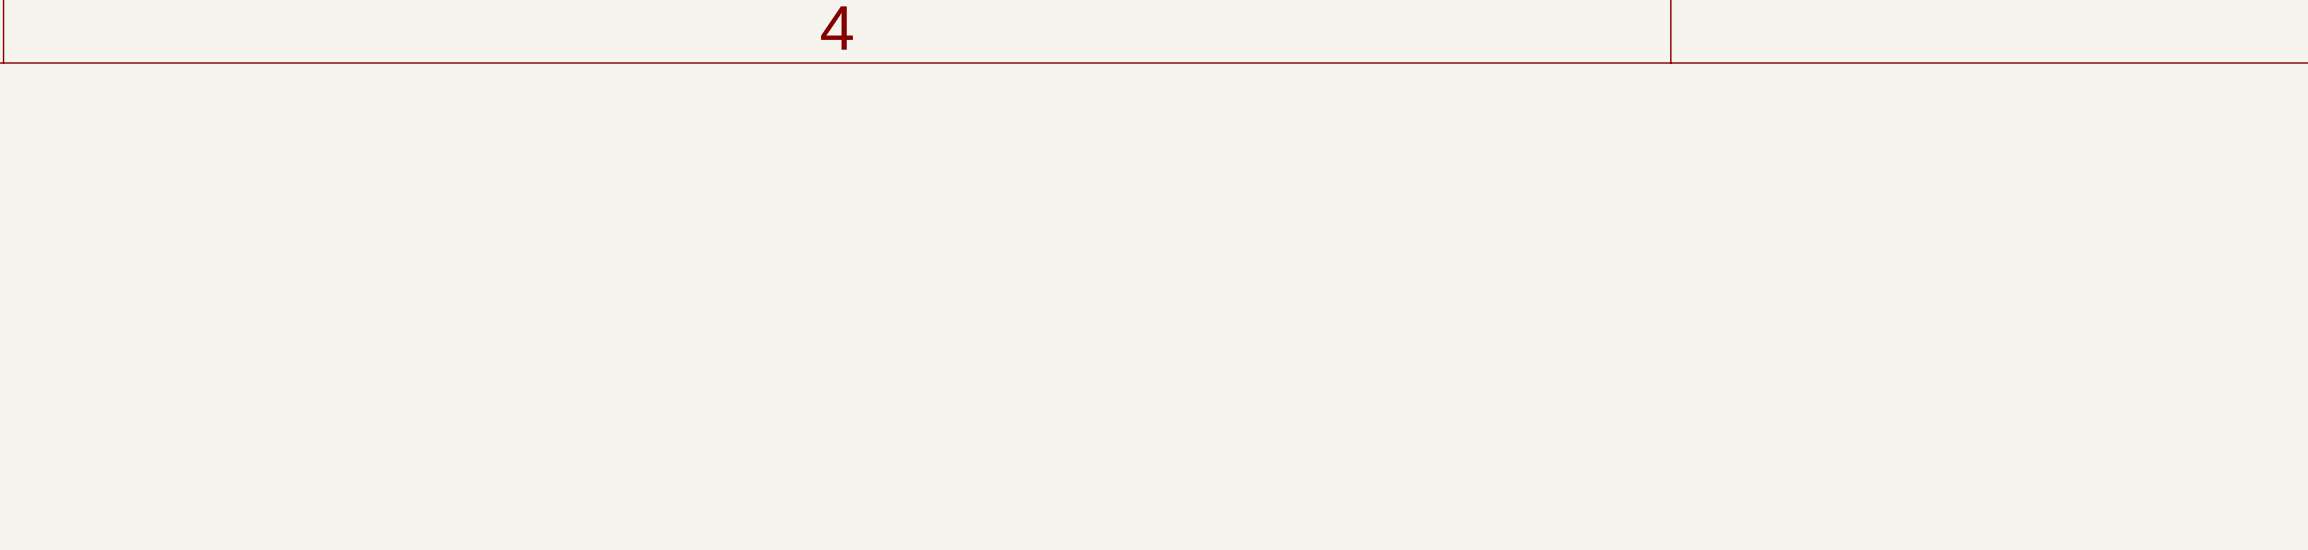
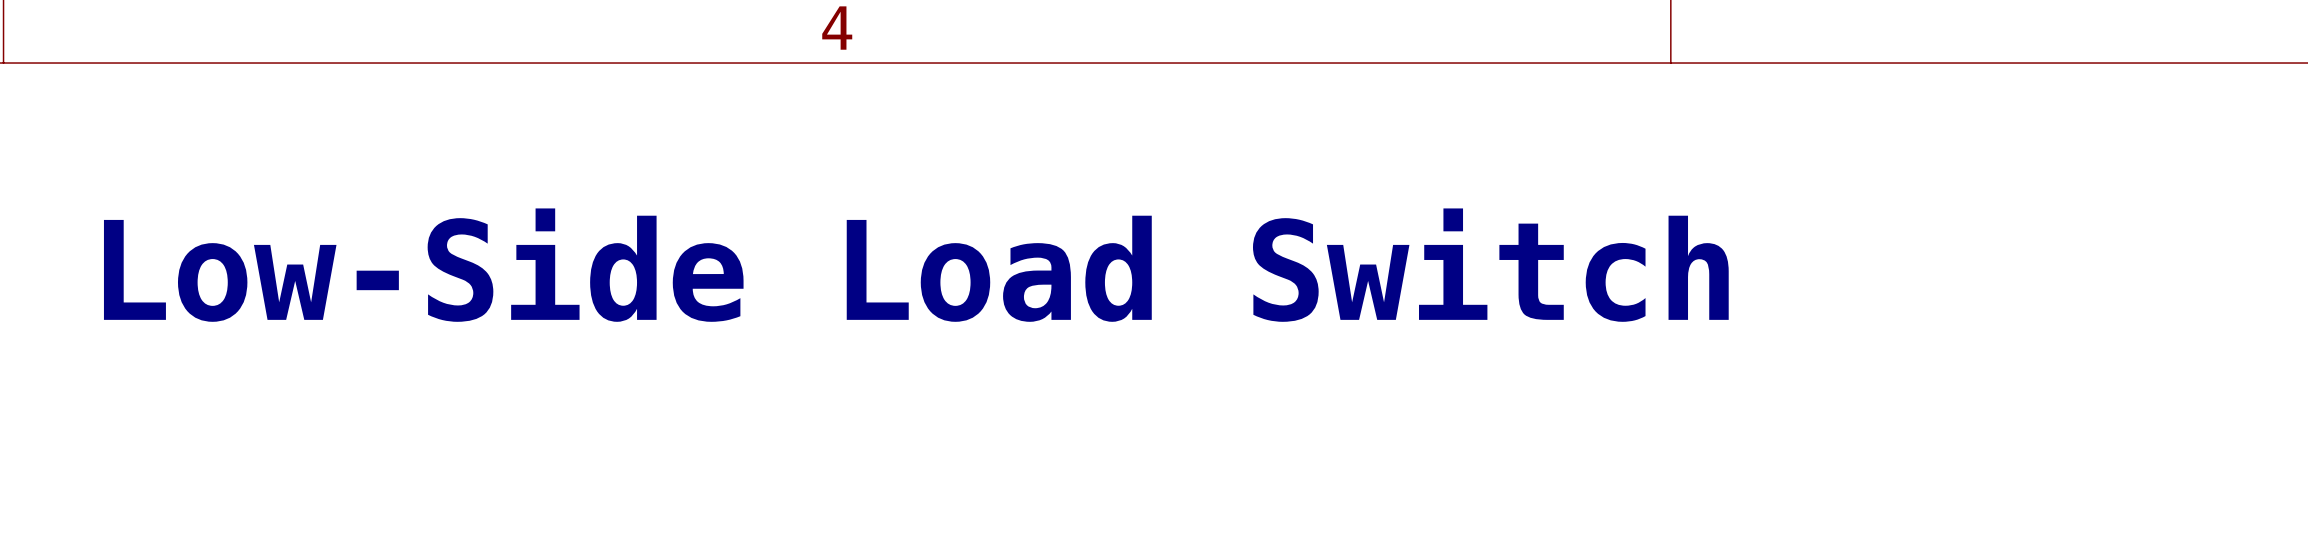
text: none -> Low-Side Load Switch (916, 265)

